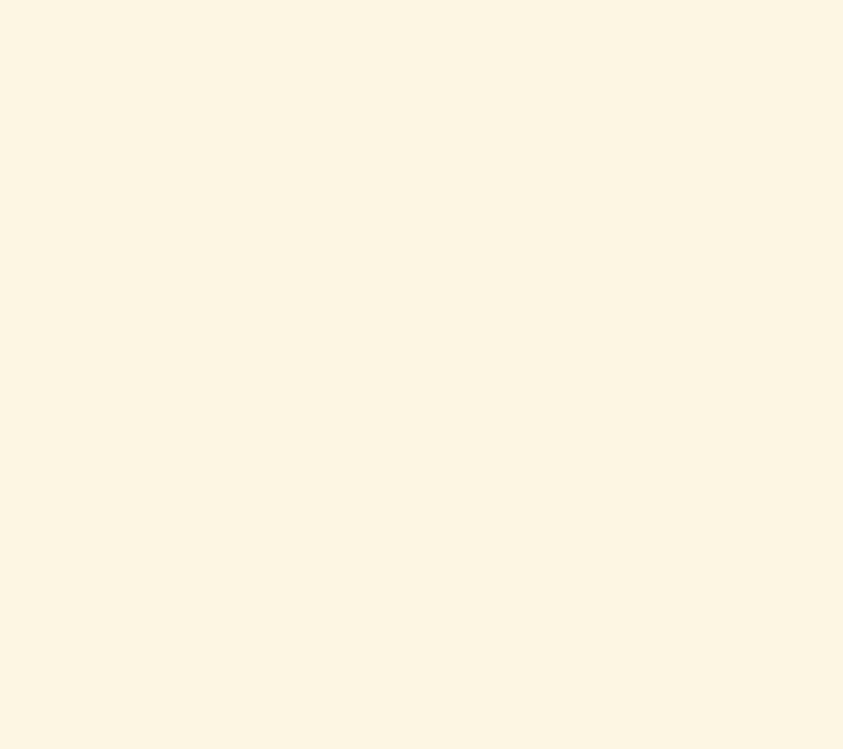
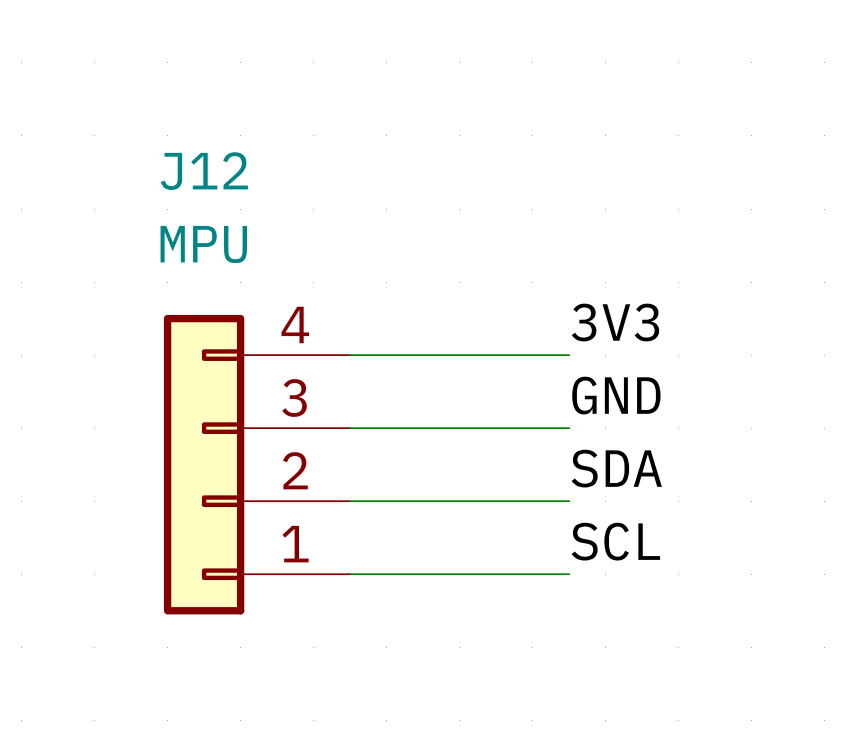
label: none -> 3V3 (615, 322)
wire: none -> (350, 355) (569, 355)
label: none -> GND (616, 395)
wire: none -> (350, 428) (569, 428)
J12: none -> MPU (257, 464)
label: none -> SDA (616, 468)
wire: none -> (350, 501) (569, 501)
label: none -> SCL (615, 541)
wire: none -> (350, 574) (569, 574)

